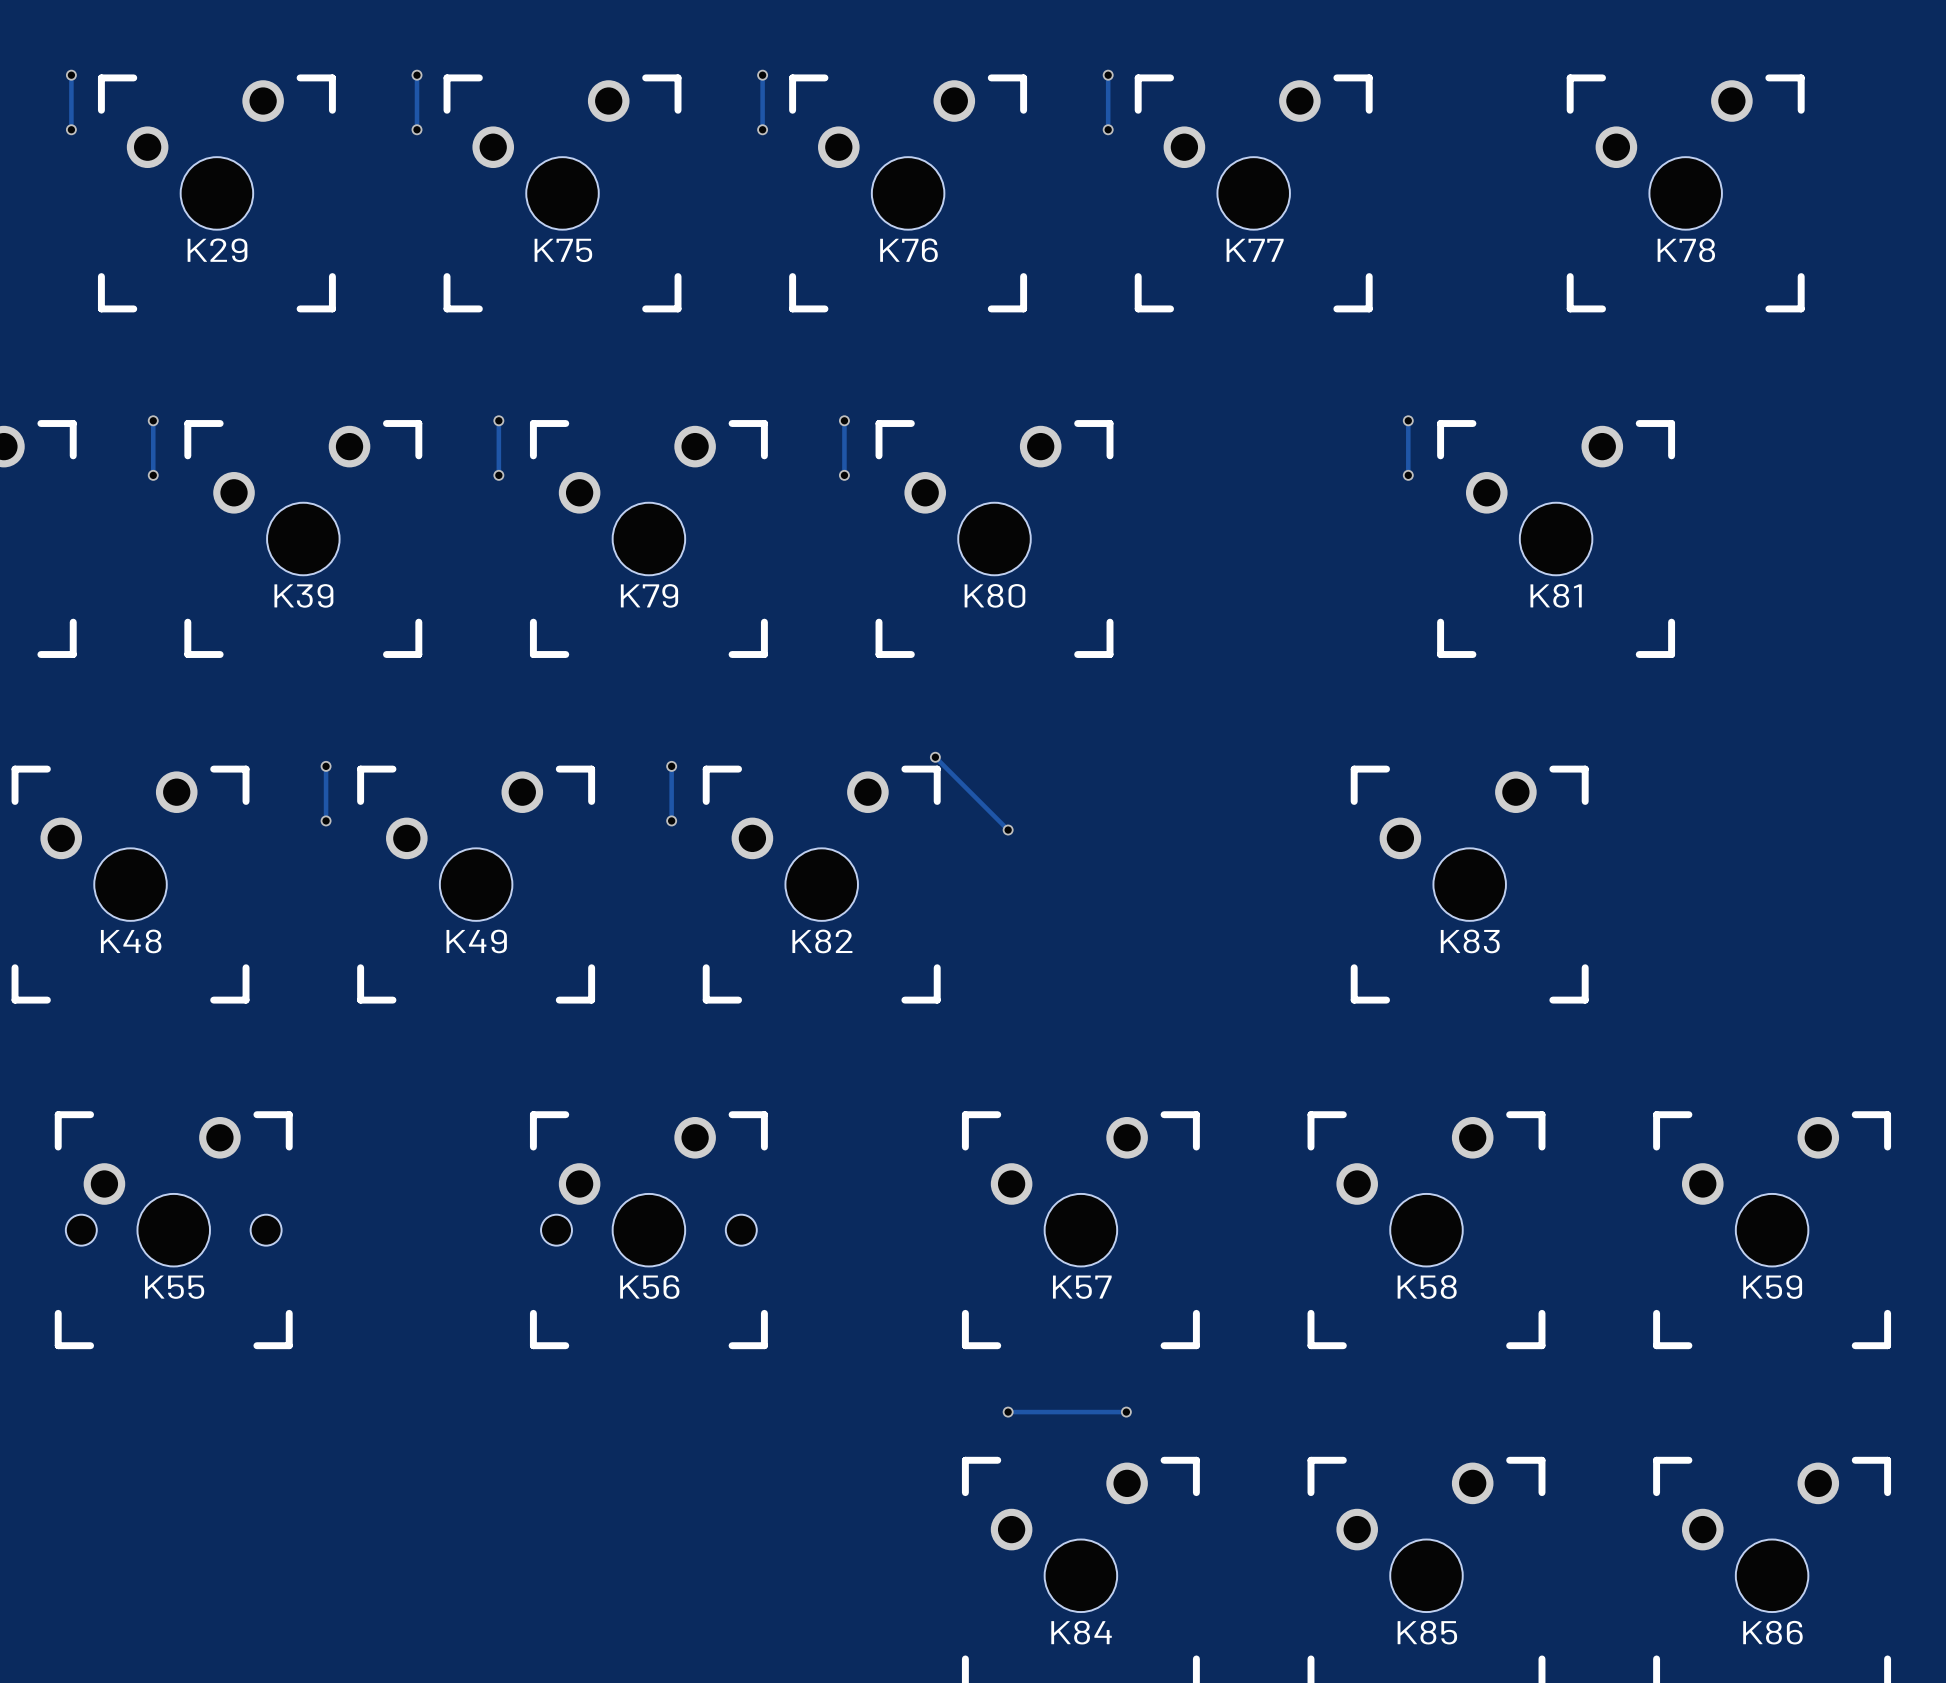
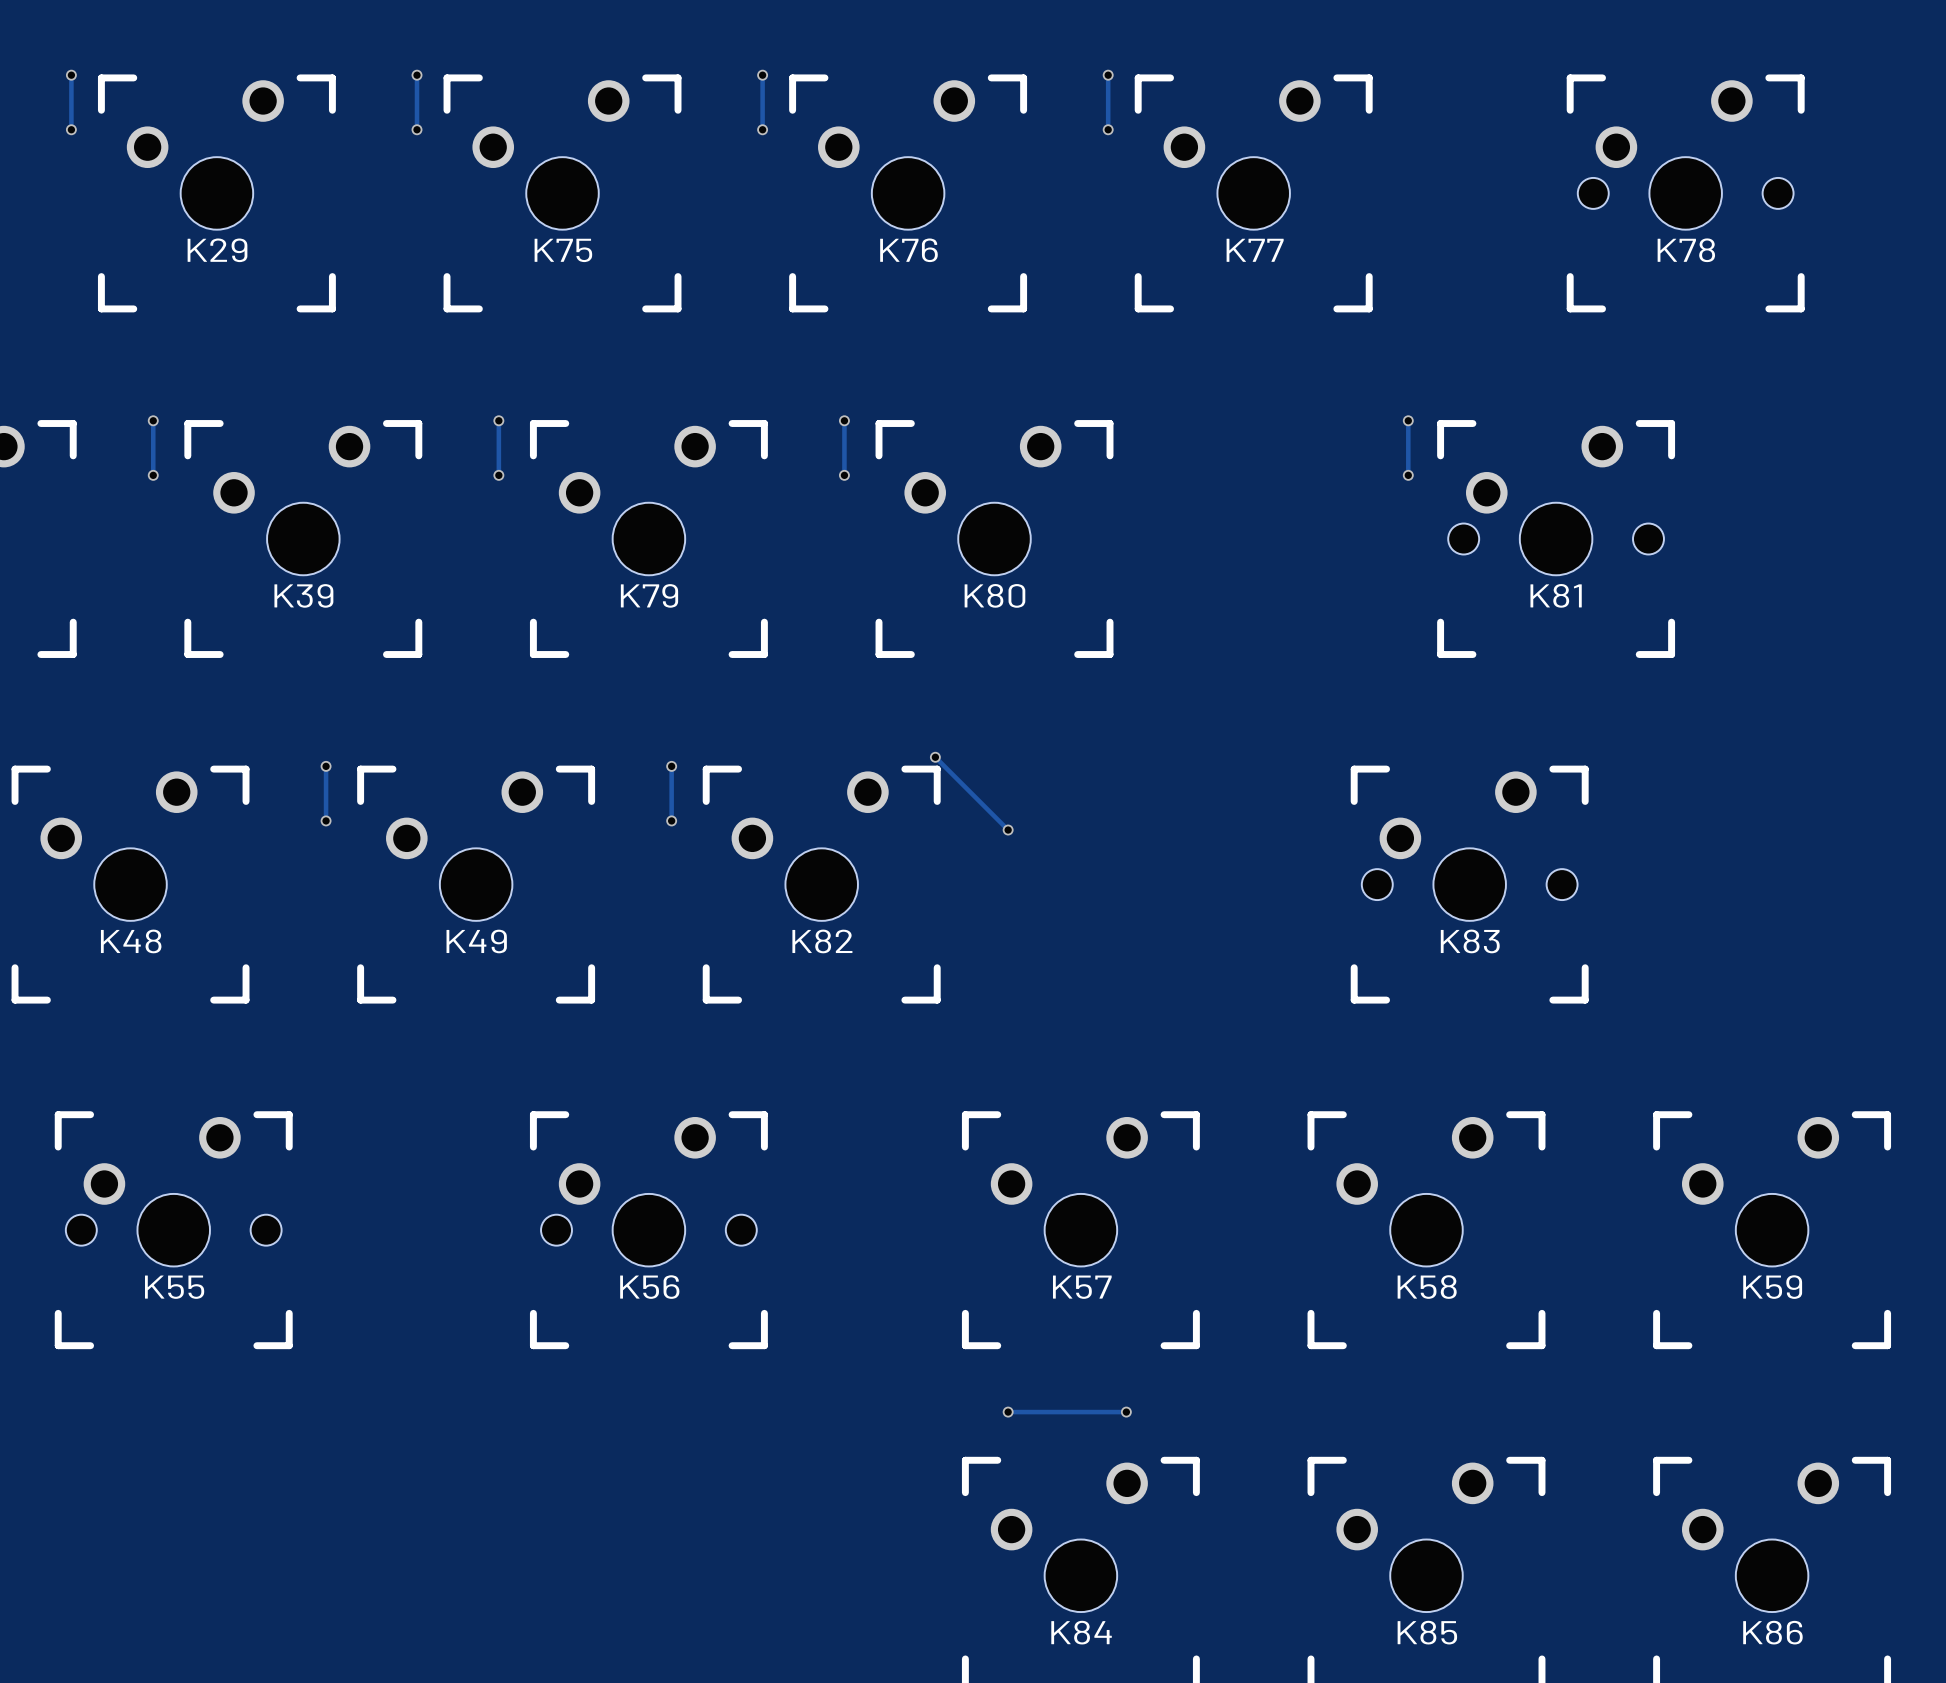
K78 footprint: [1566, 74, 1805, 313] -> [1566, 74, 1805, 313]
K81 footprint: [1437, 420, 1676, 658] -> [1437, 420, 1676, 658]
K83 footprint: [1350, 765, 1589, 1004] -> [1350, 765, 1589, 1004]

